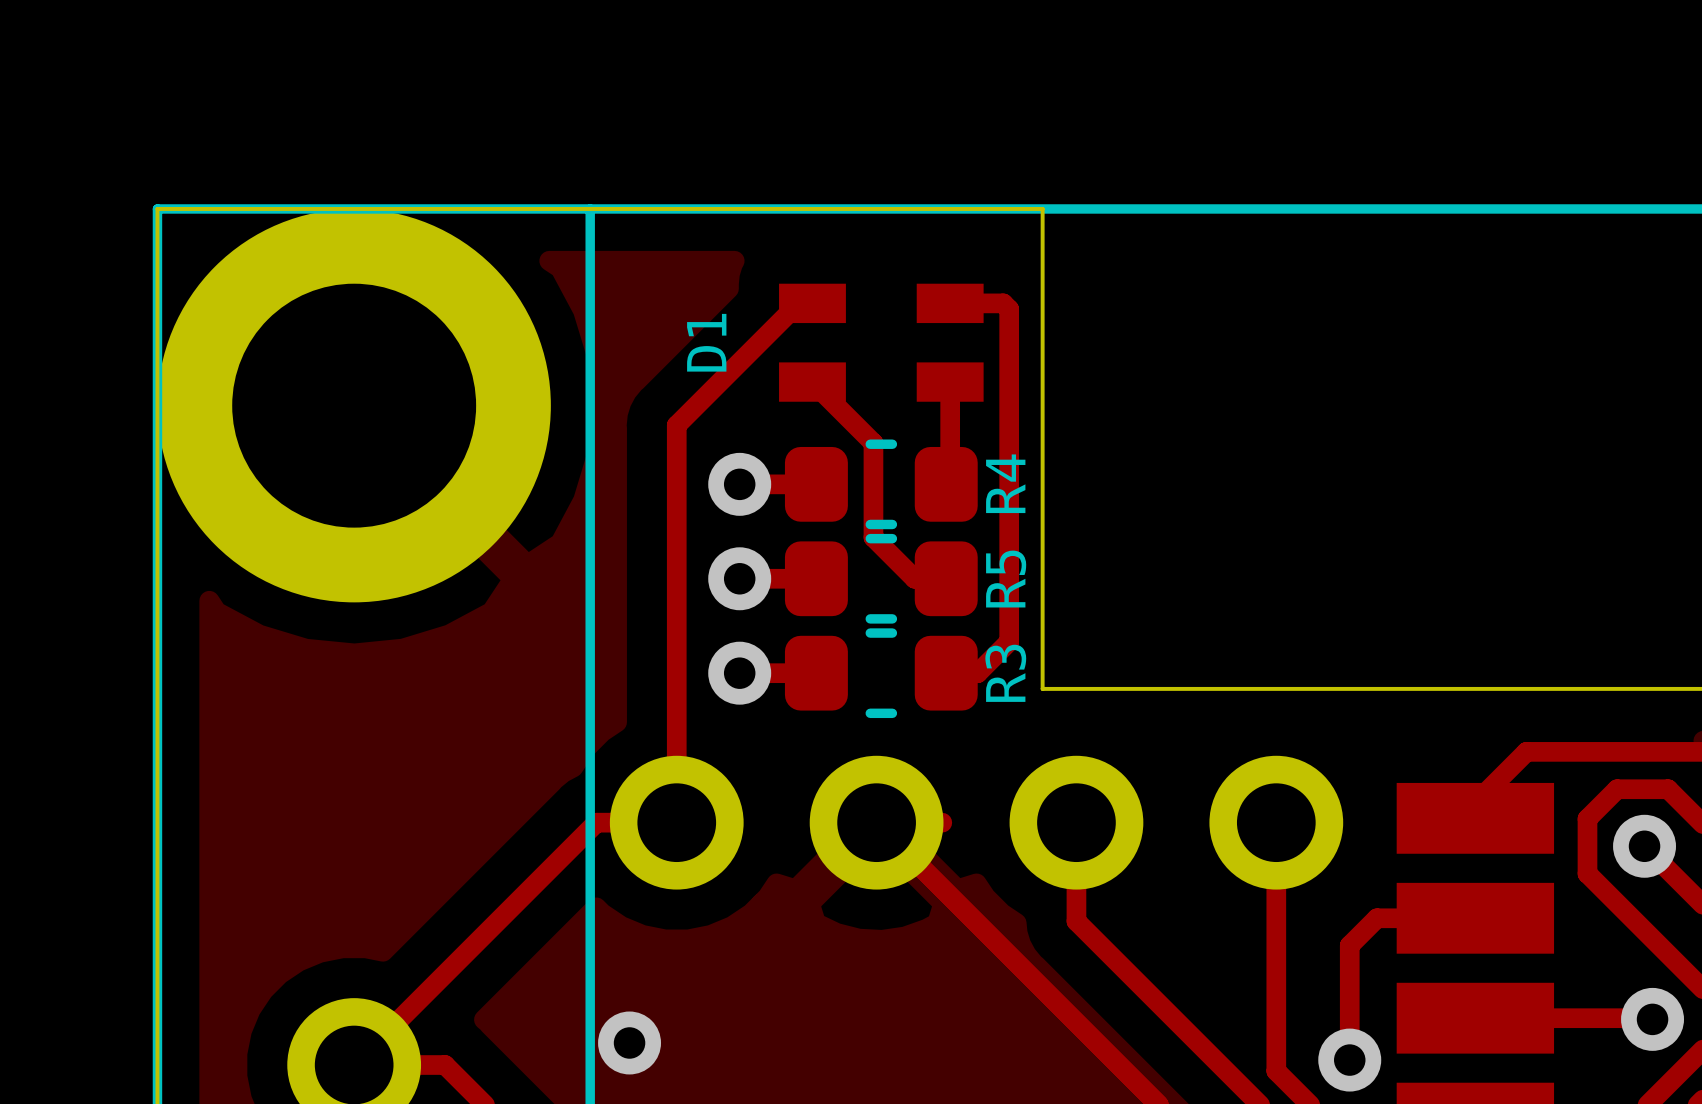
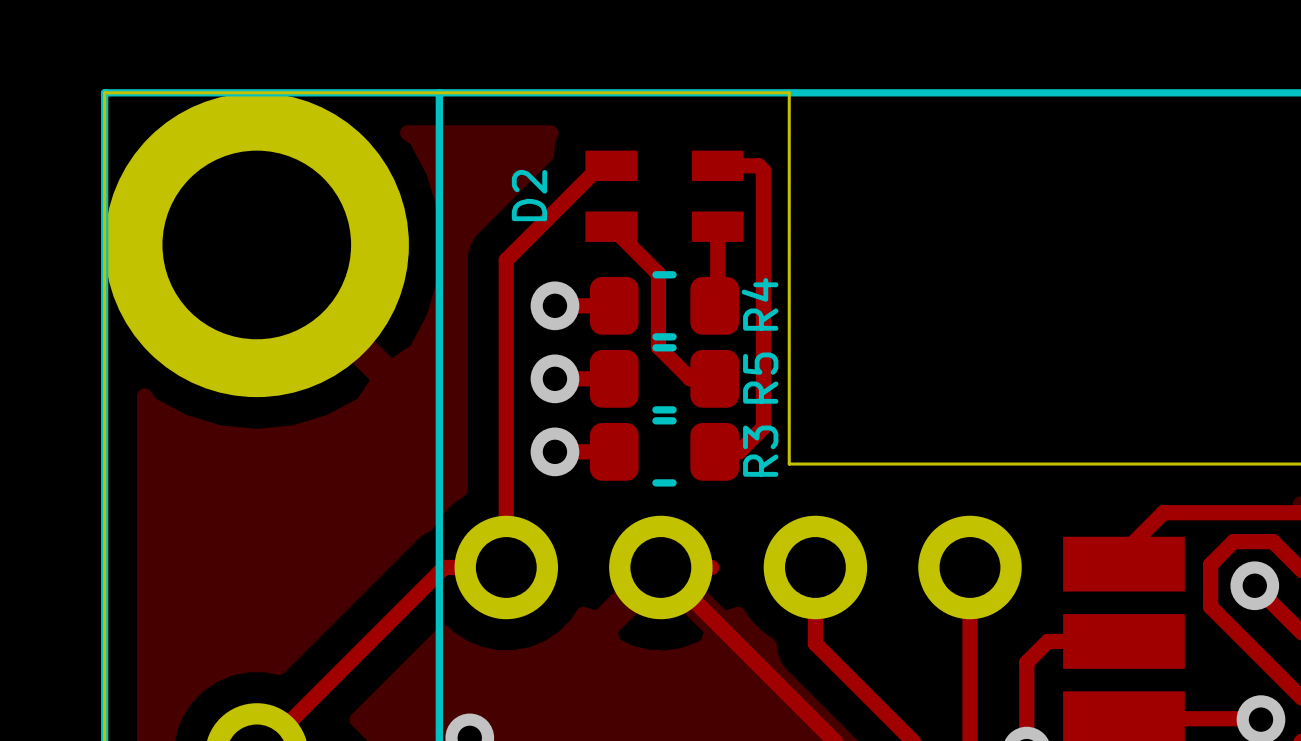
D1 name: D1 (706, 342) -> D2 (529, 195)

